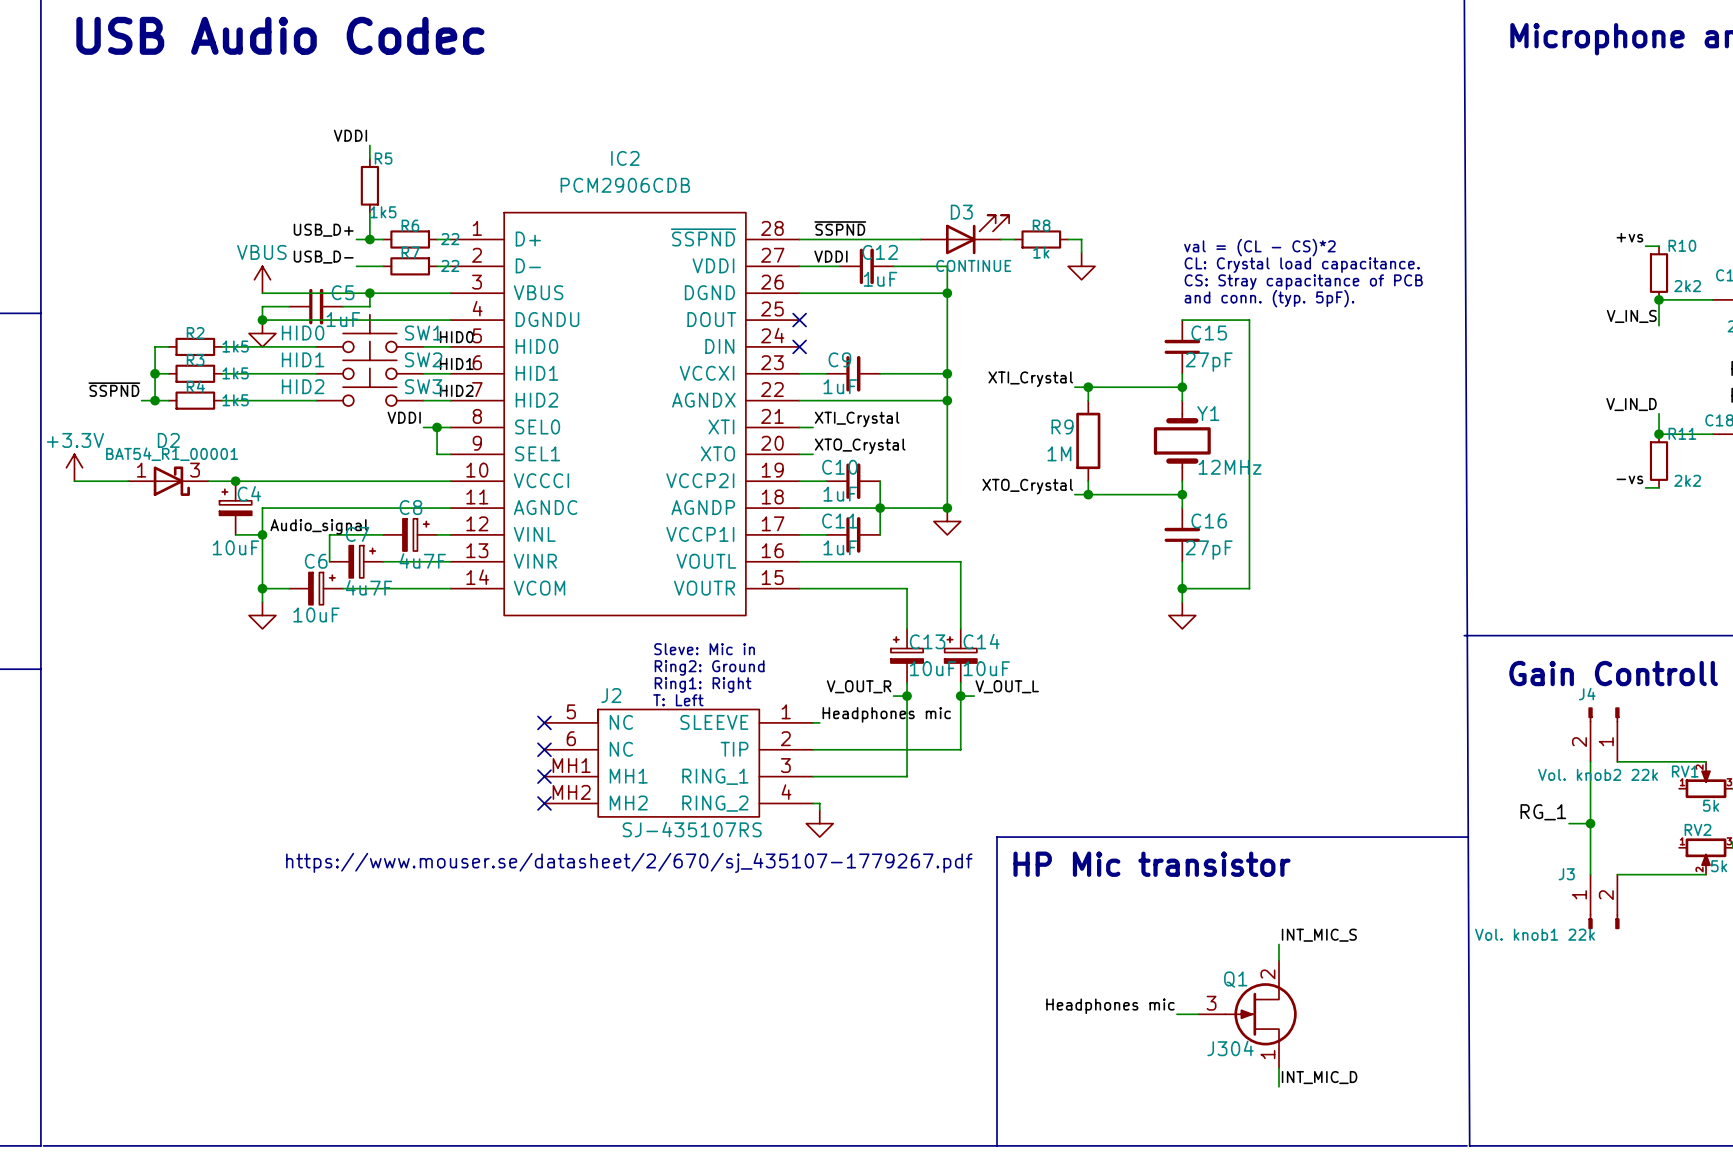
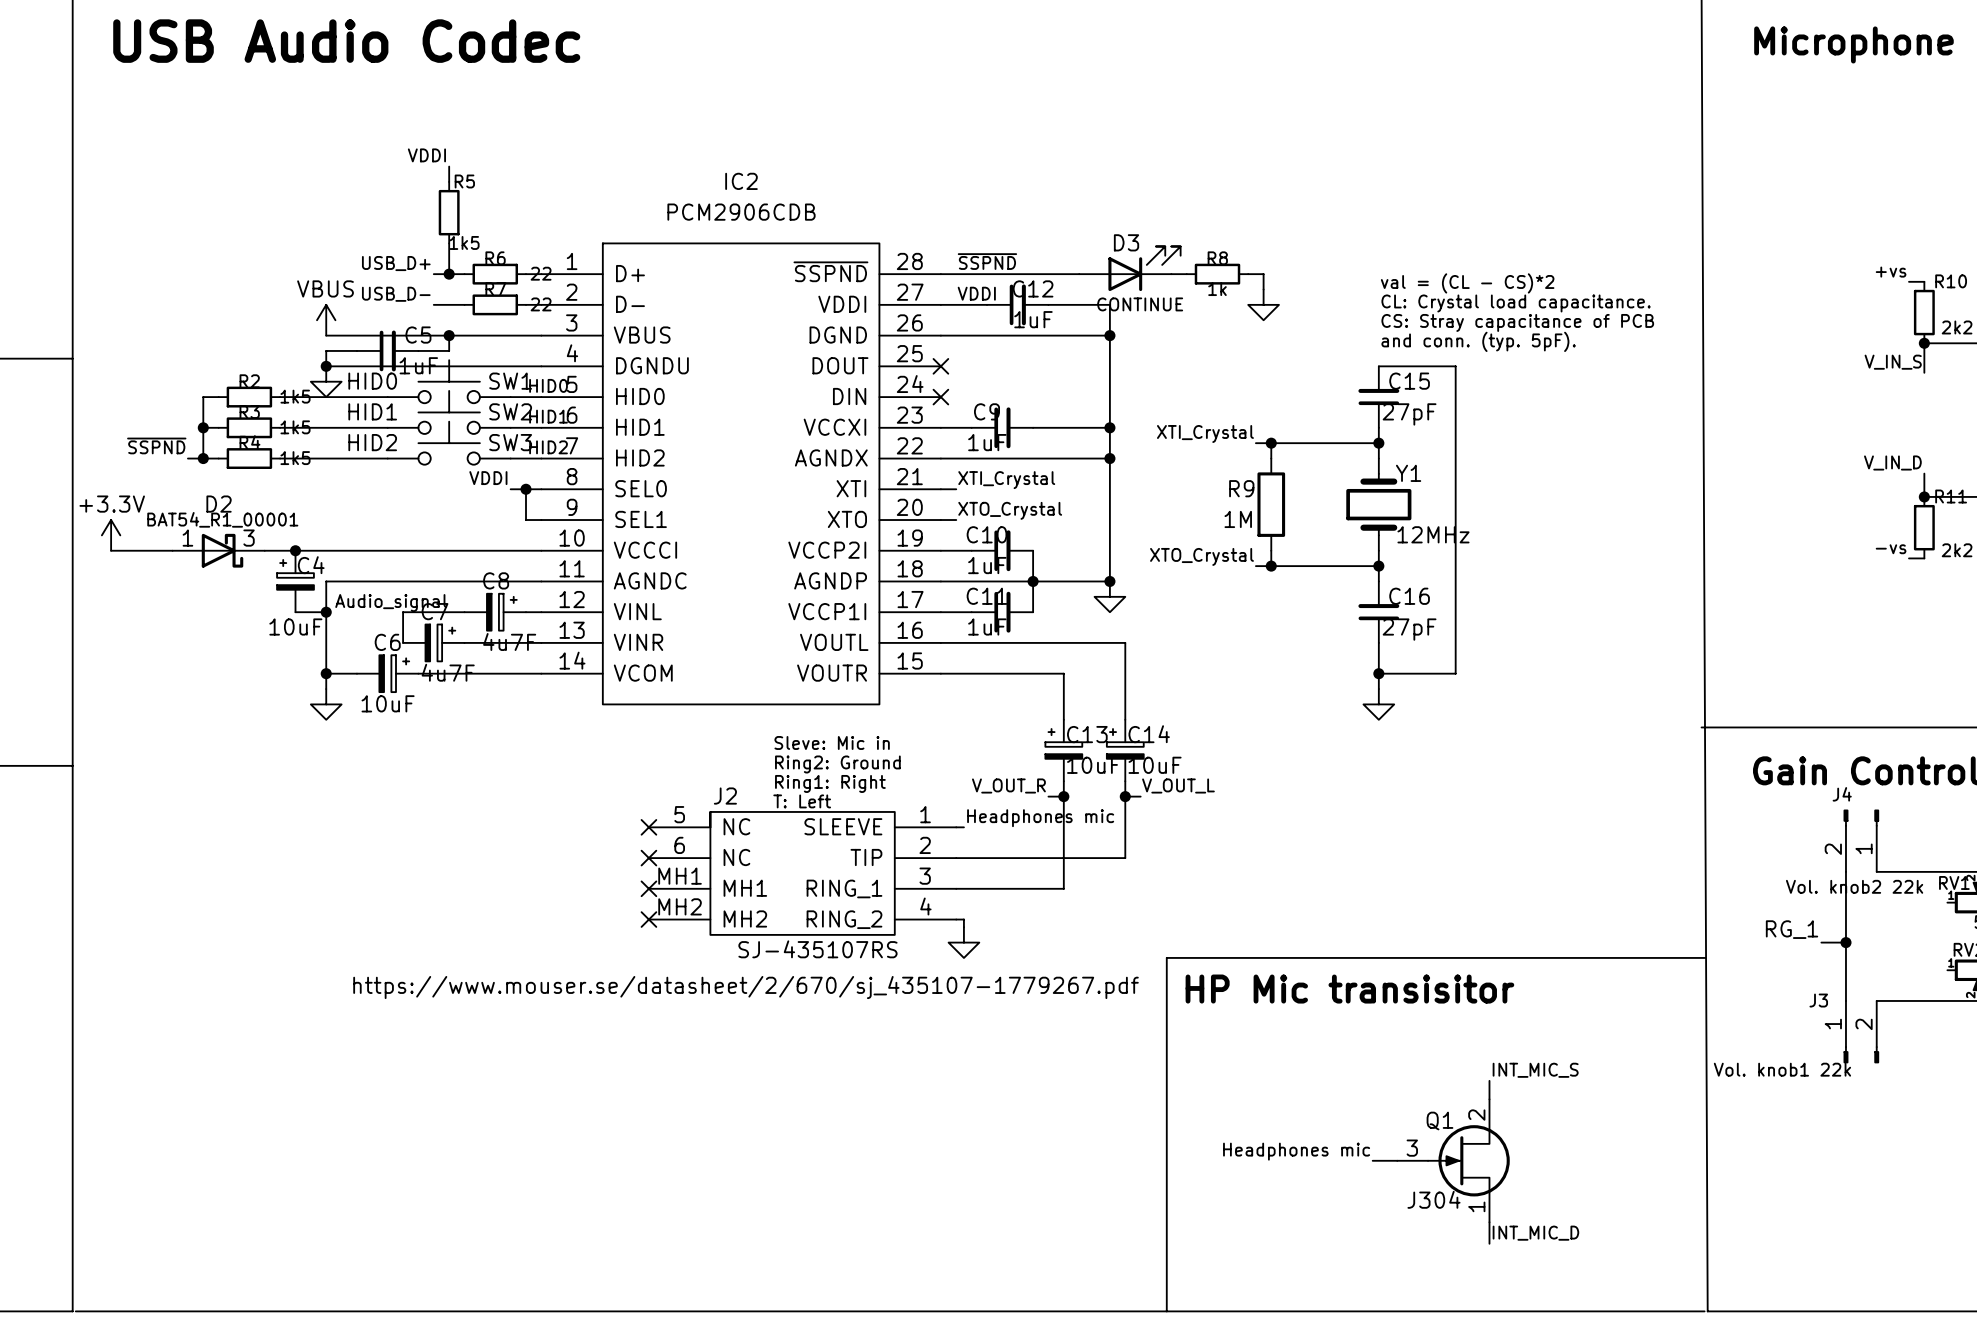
text: HP Mic transistor (1152, 864) -> HP Mic transisitor (1349, 989)

